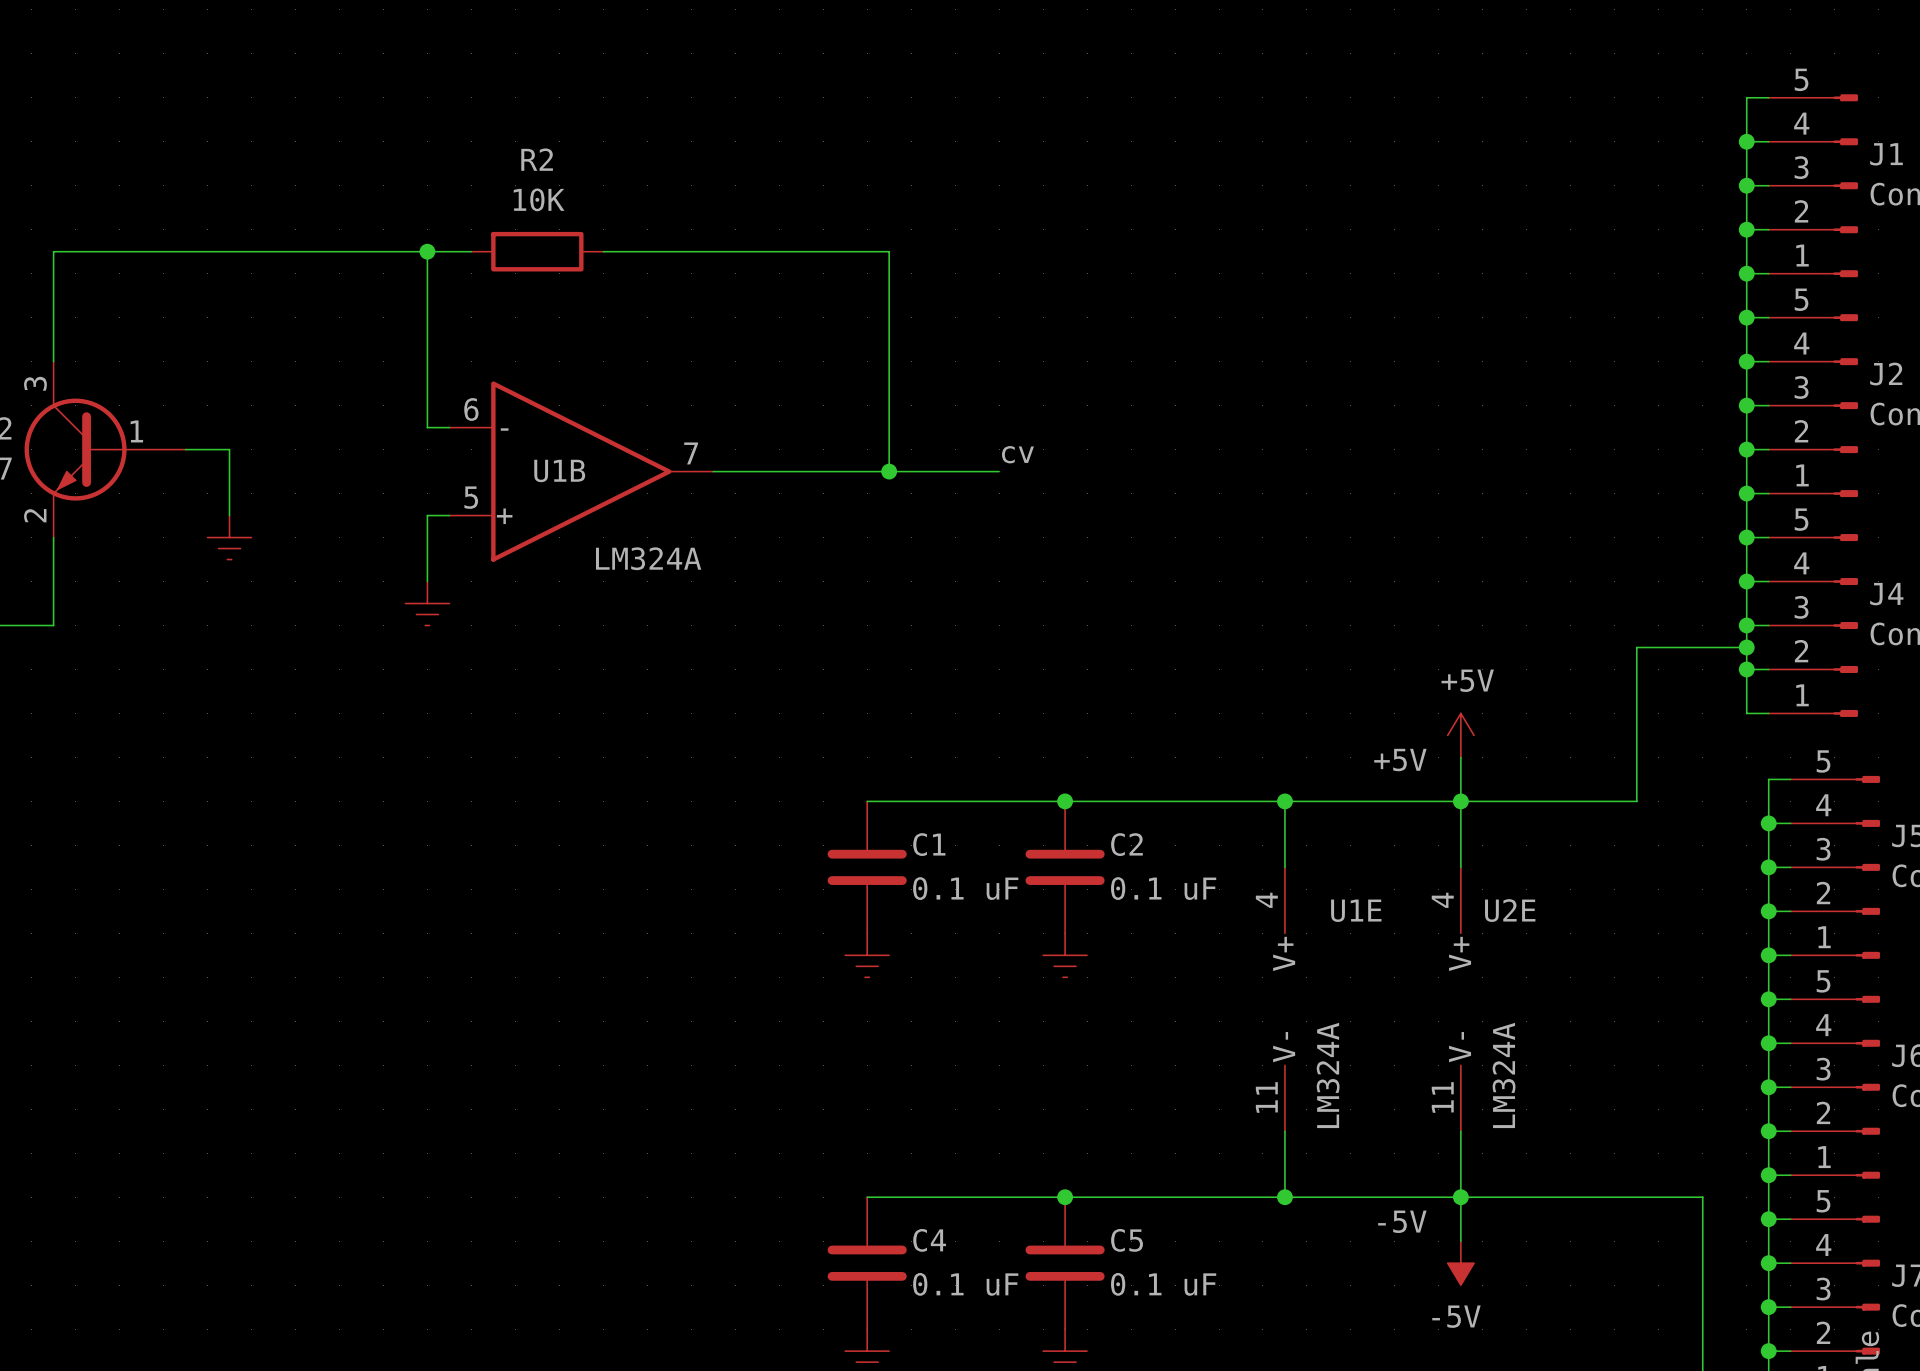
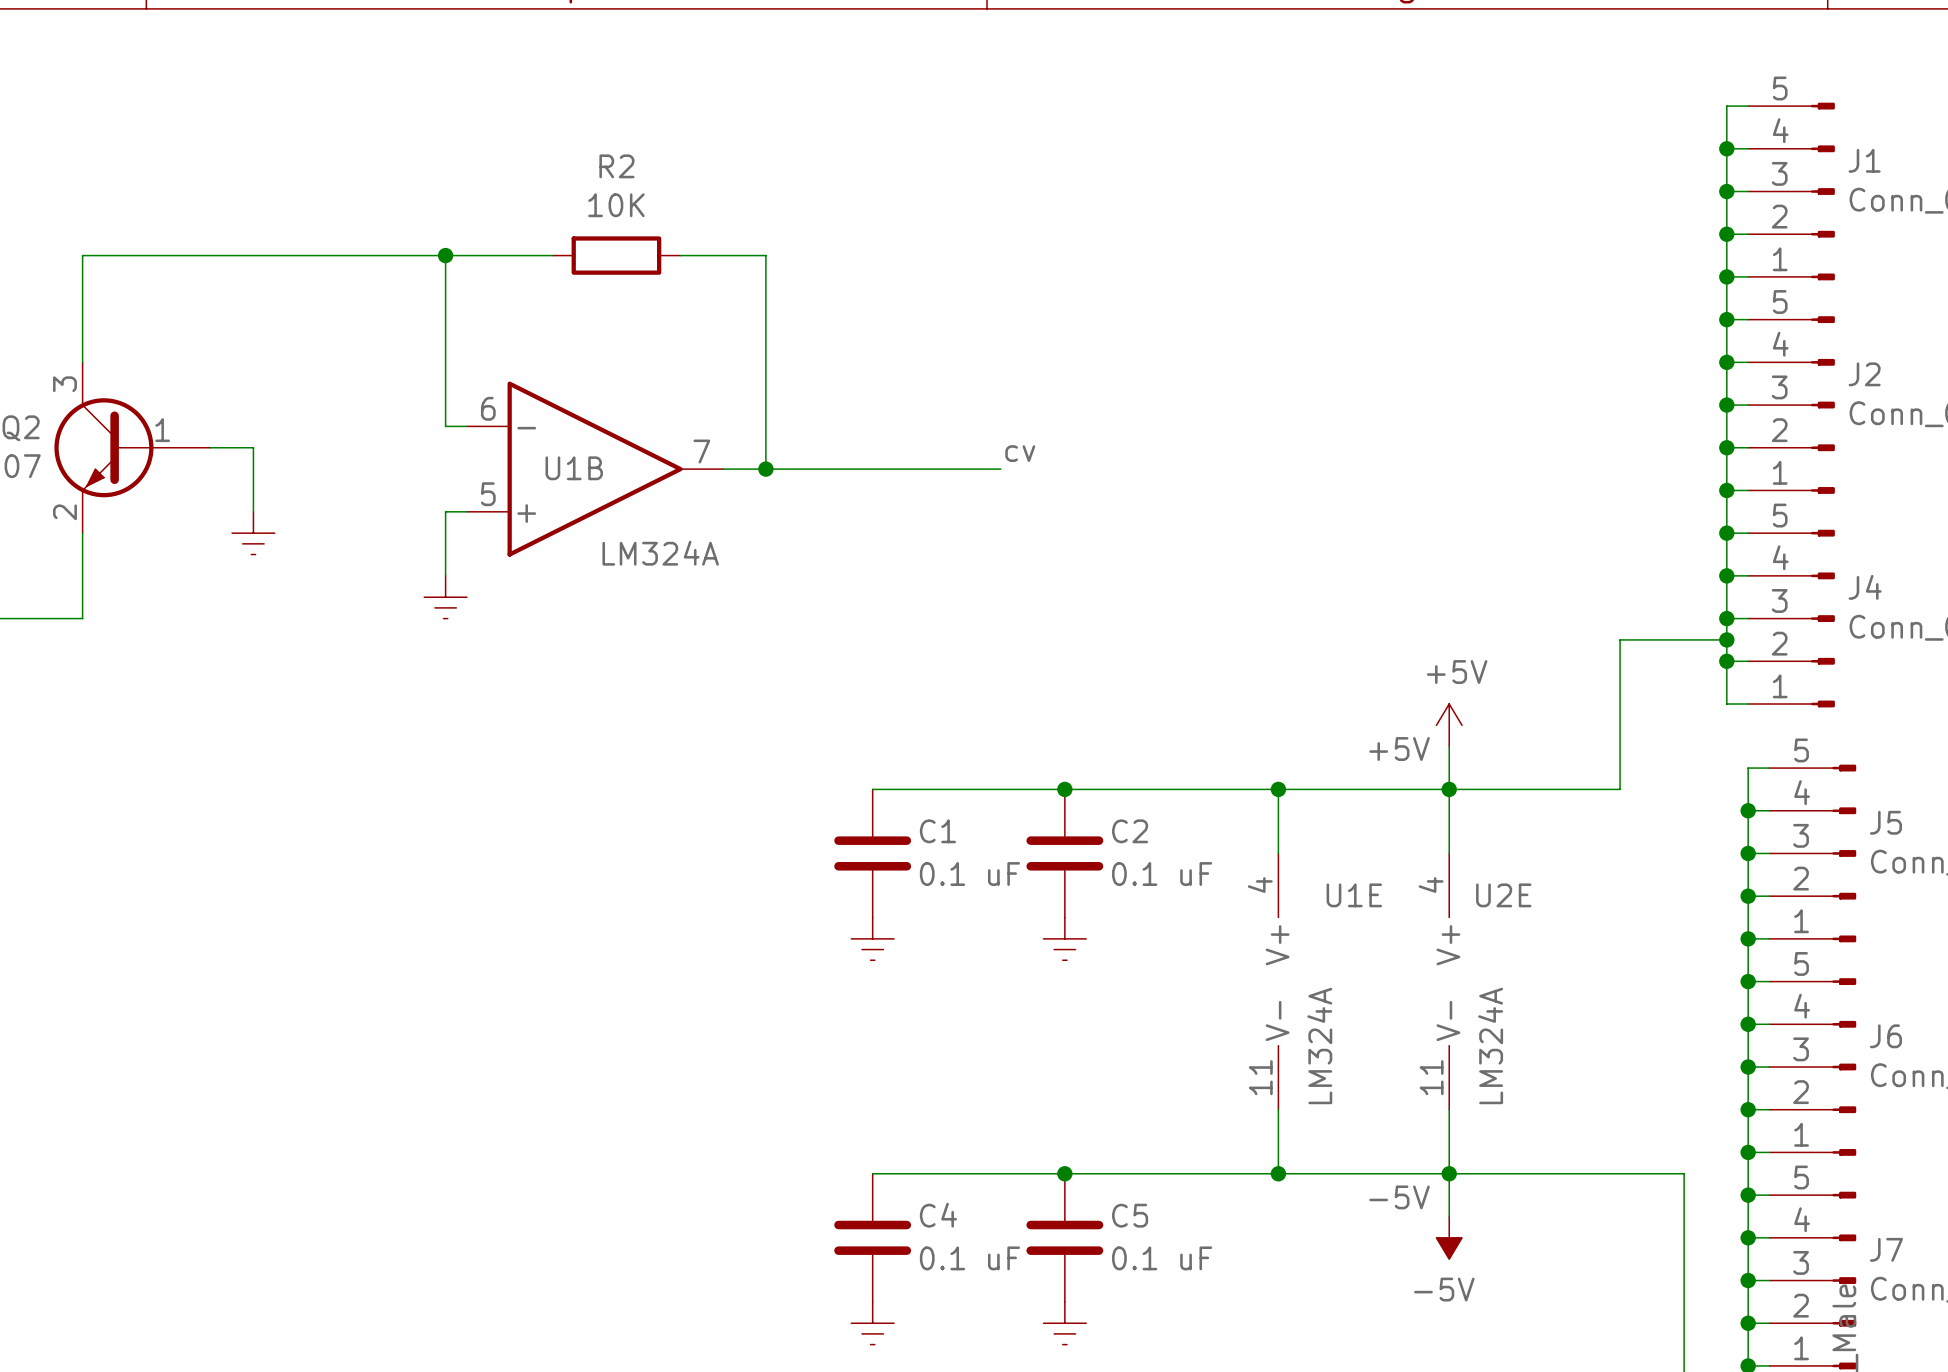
R2 position: (537, 251) -> (616, 255)
wire: (603, 251) (669, 251) -> (488, 255) (552, 255)
wire: (757, 251) (889, 251) (889, 471) -> (765, 255) (765, 469)
junction: none -> (765, 469)
junction: (889, 471) -> none

